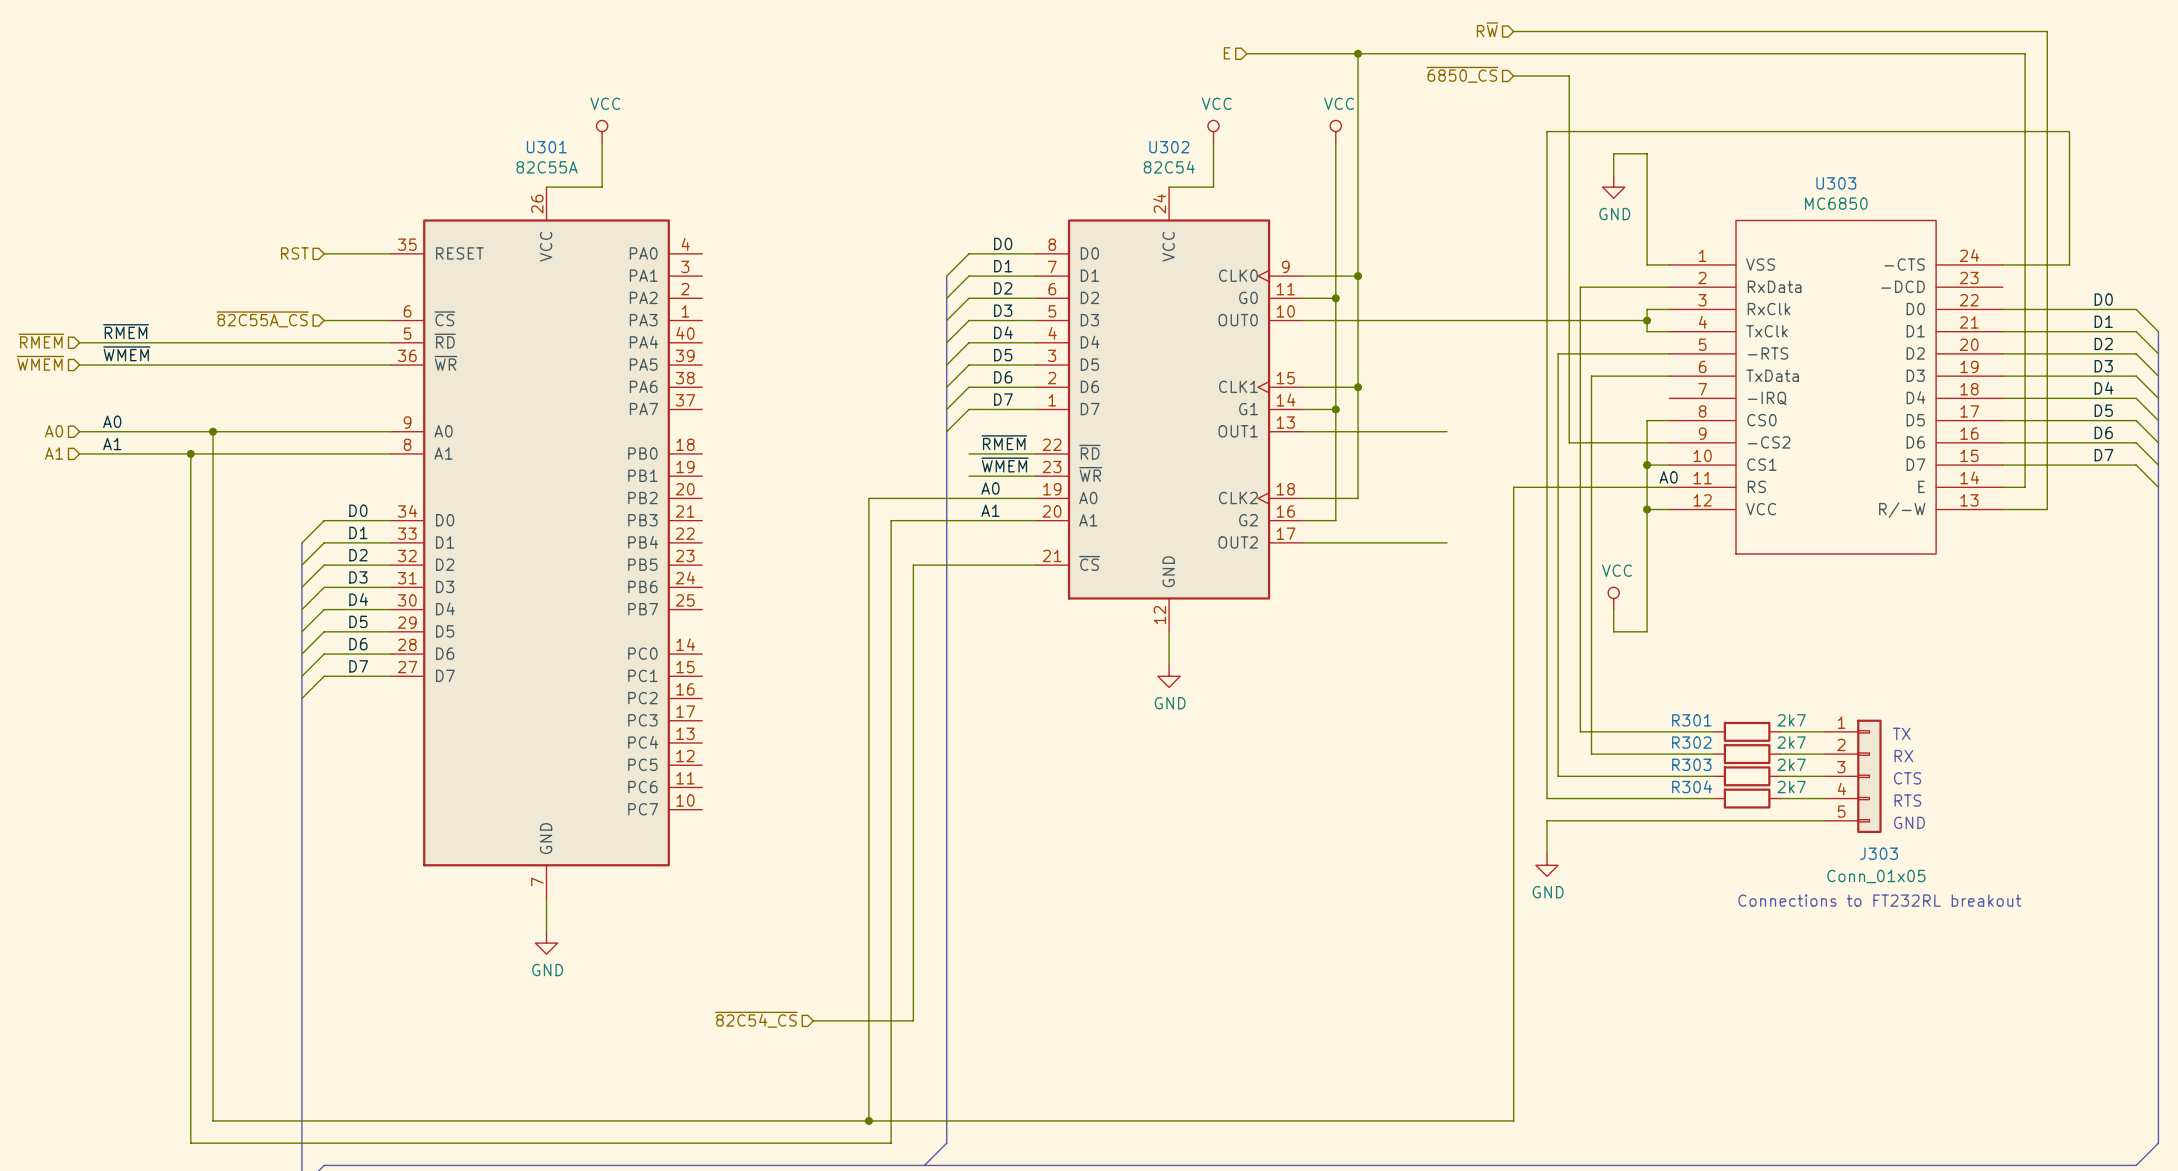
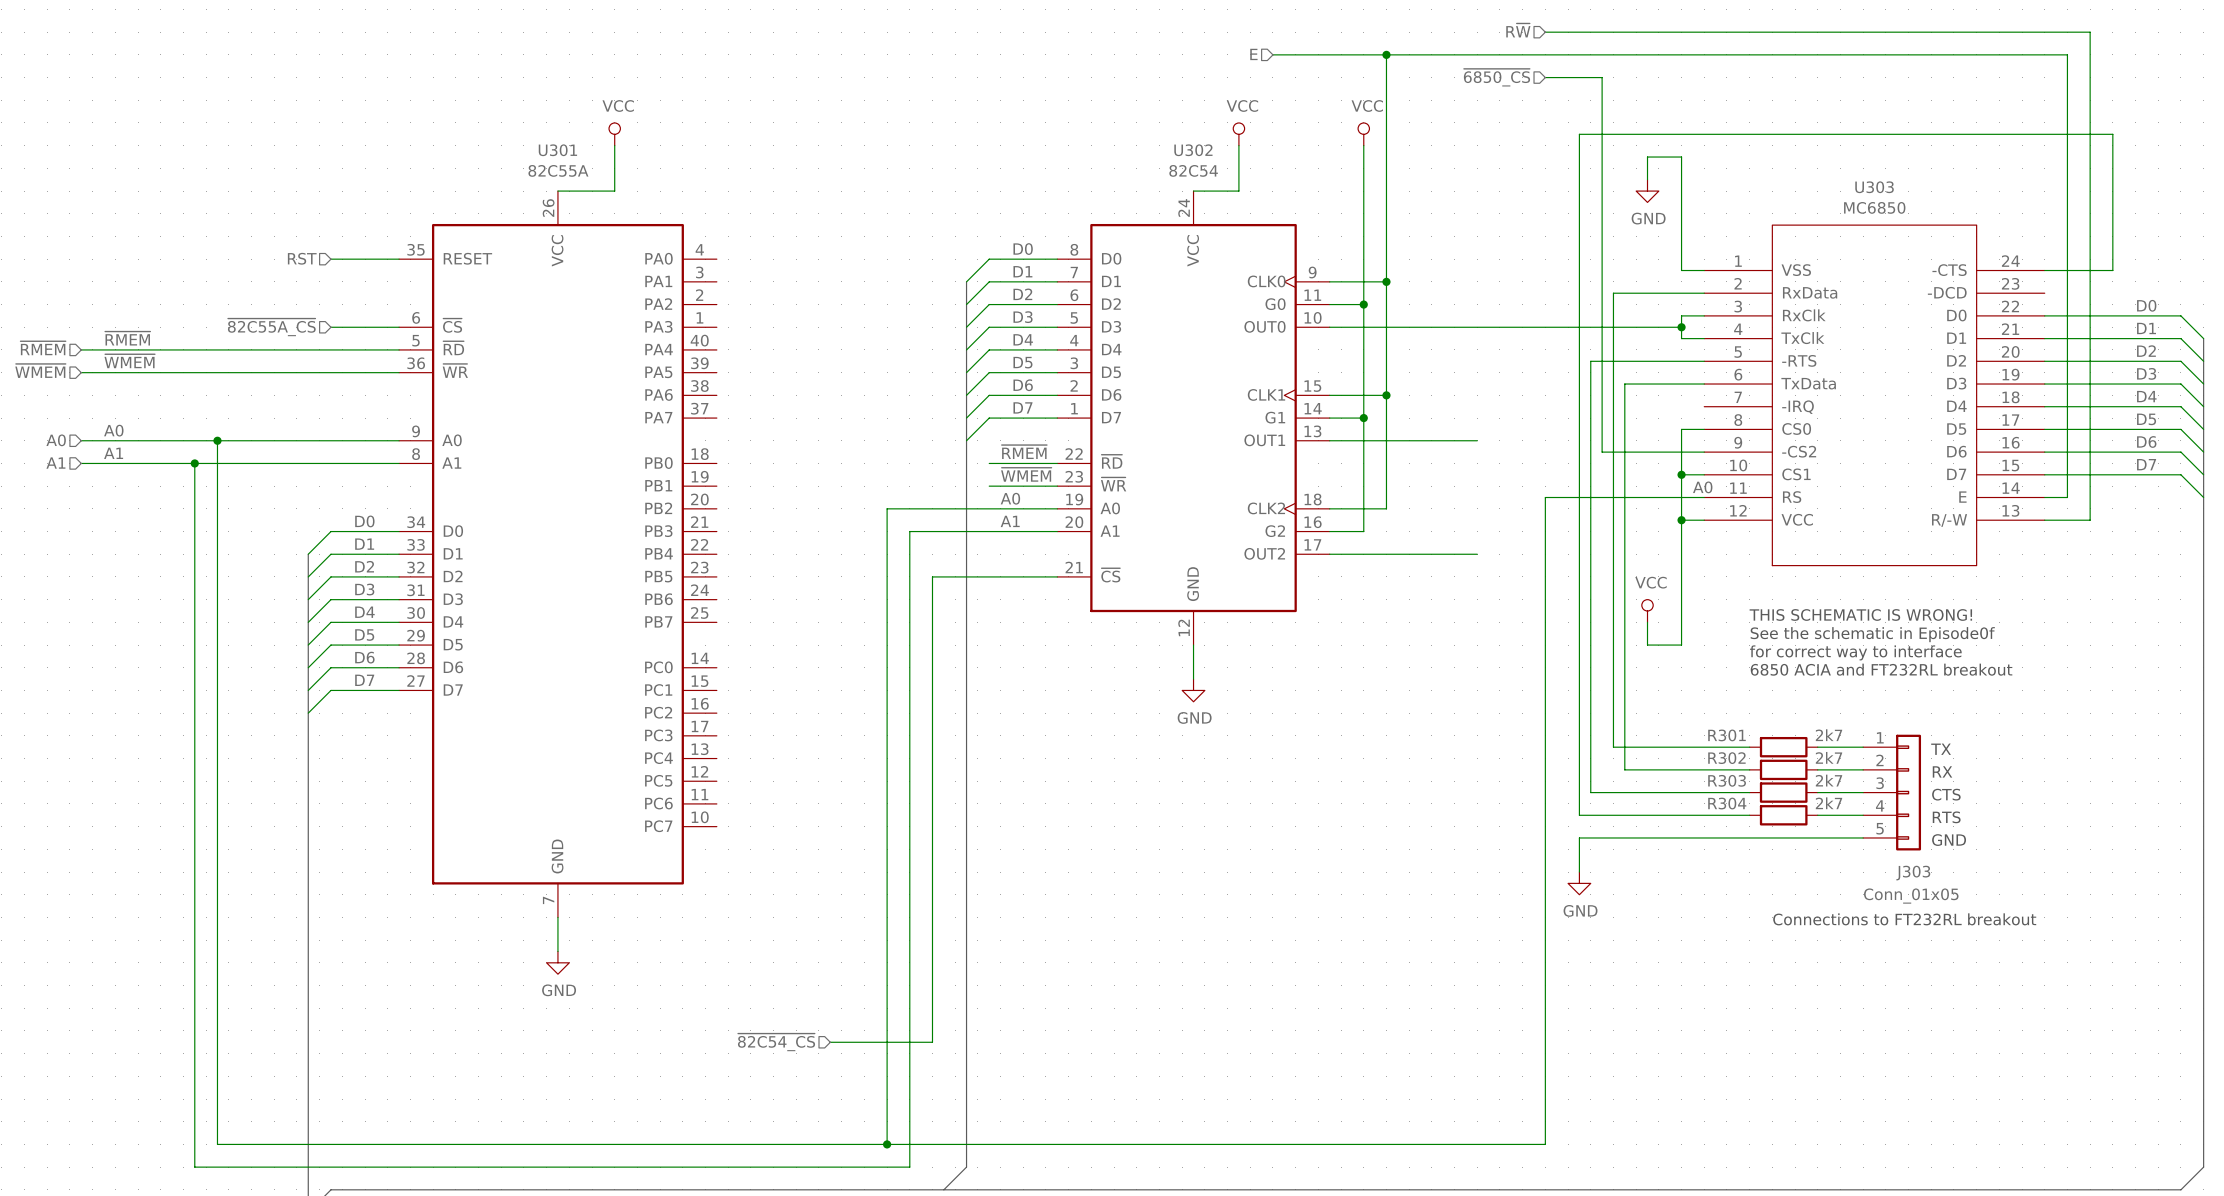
text: none -> THIS SCHEMATIC IS WRONG! (1860, 614)
text: none -> See the schematic in Episode0f (1872, 634)
text: none -> for correct way to interface (1855, 652)
text: none -> 6850 ACIA and FT232RL breakout (1881, 669)

